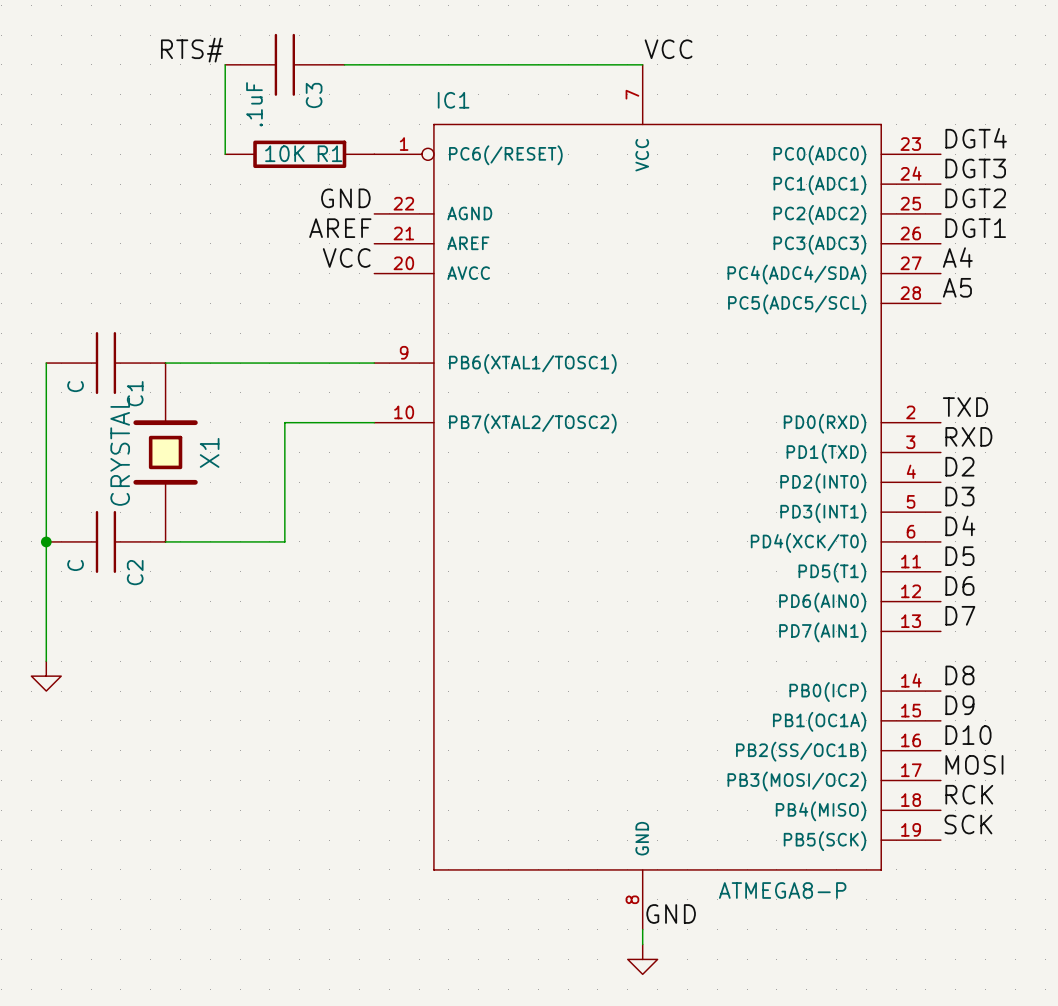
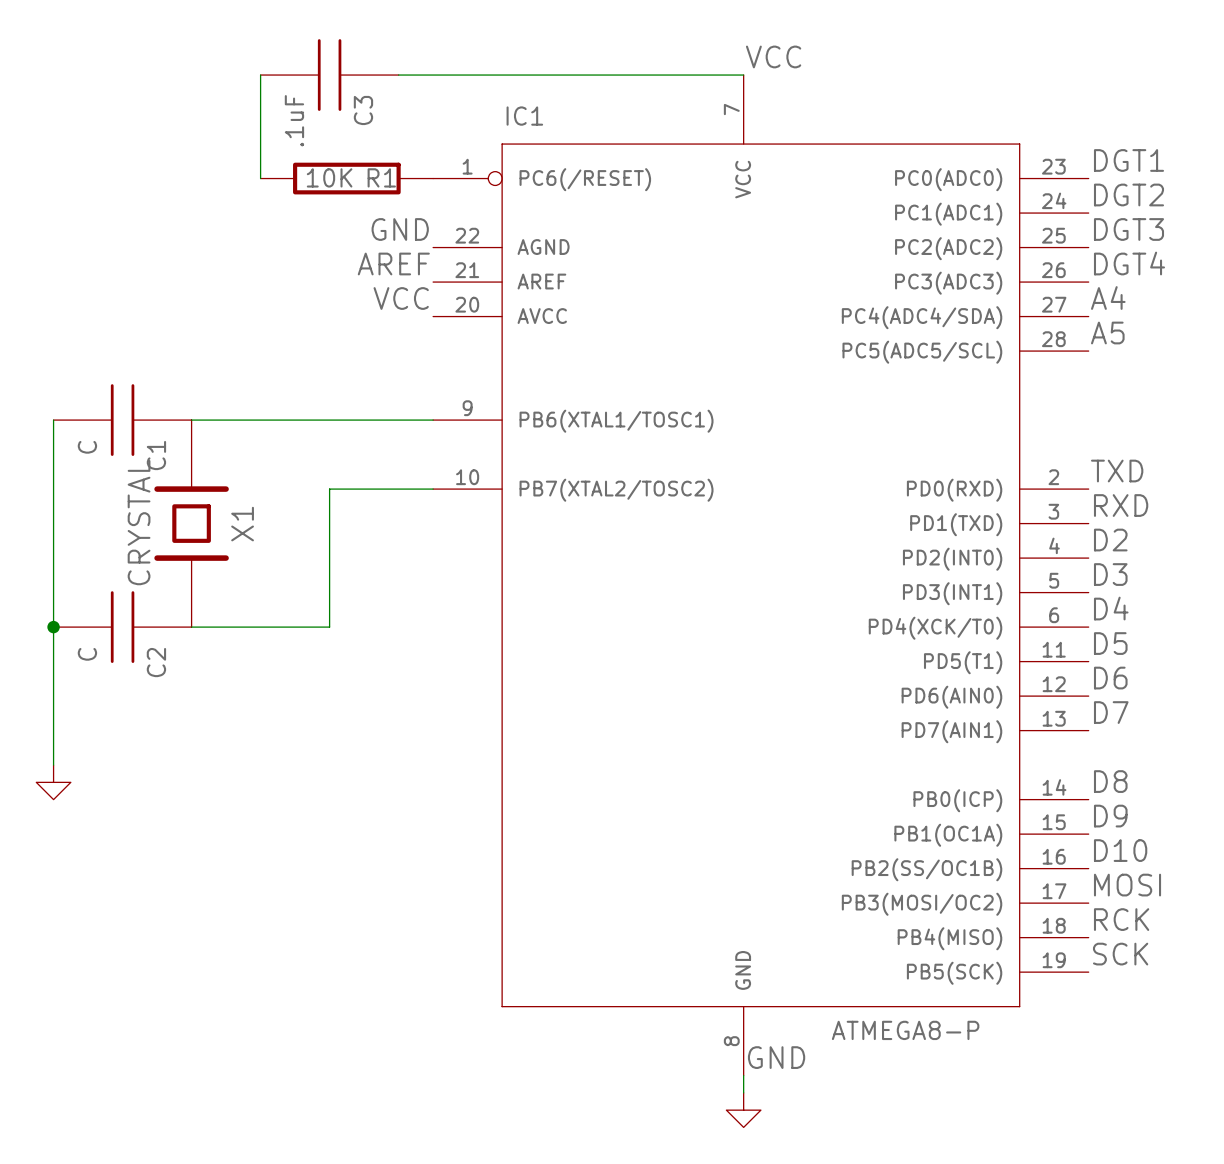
label: RTS# (192, 50) -> none
label: DGT4 (976, 138) -> DGT1 (1128, 160)
label: DGT3 (975, 168) -> DGT2 (1128, 194)
label: DGT2 (975, 198) -> DGT3 (1128, 229)
label: DGT1 (975, 228) -> DGT4 (1129, 263)

